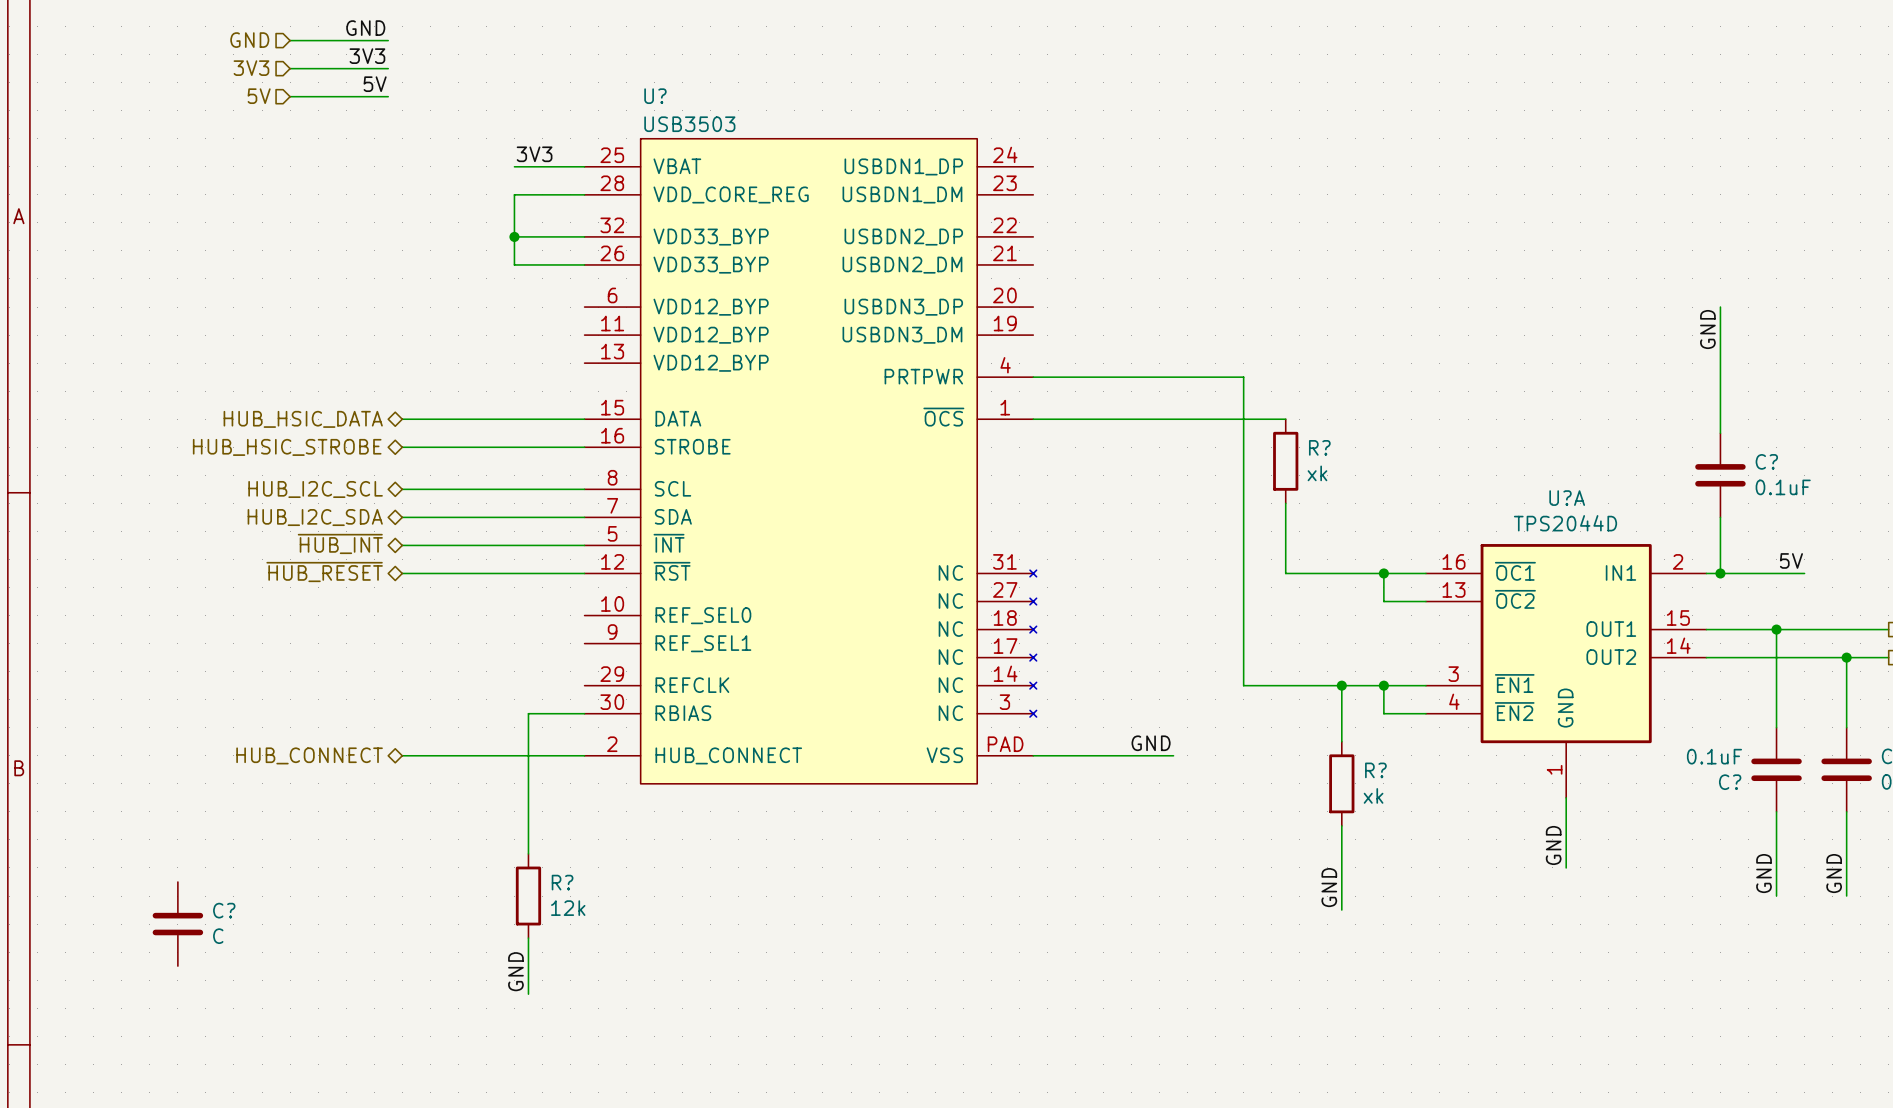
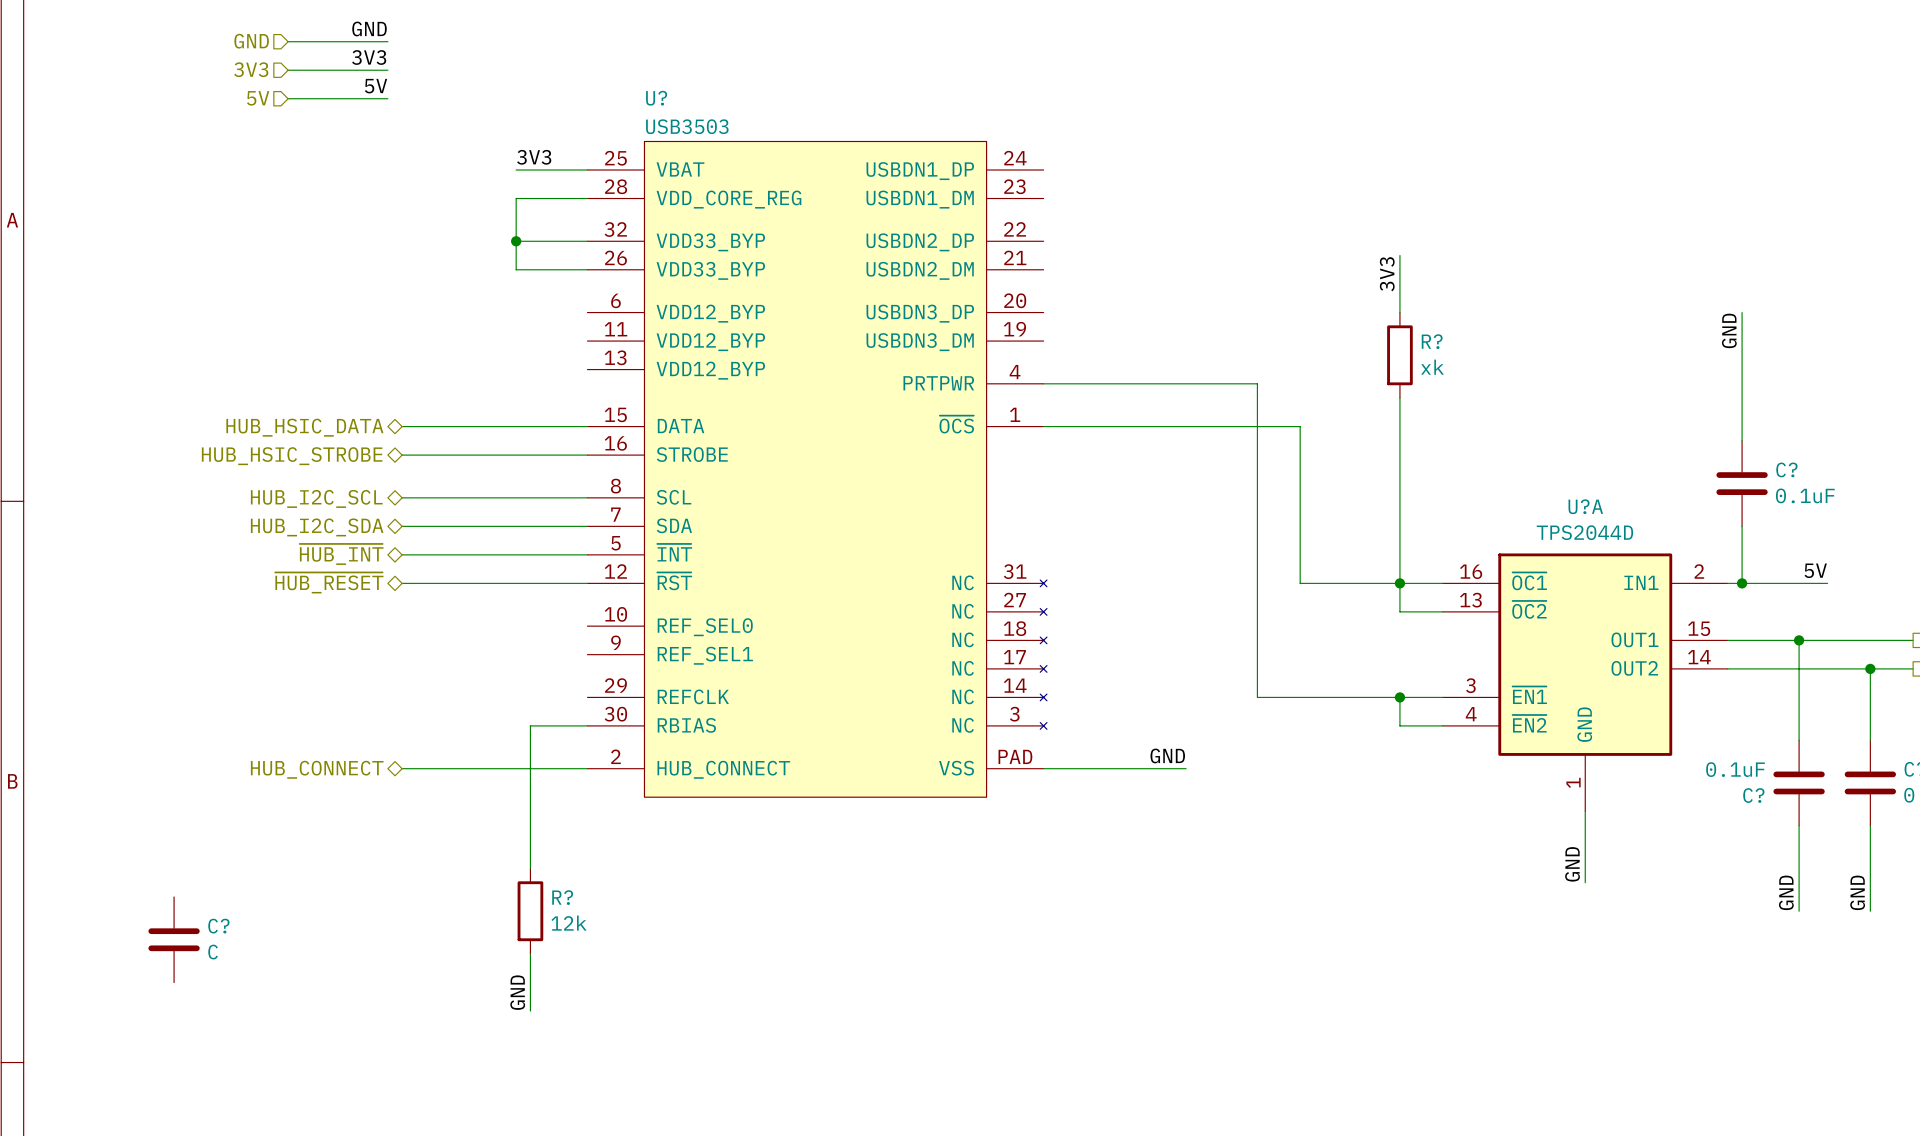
wire: none -> (1399, 255) (1399, 312)
label: none -> 3V3 (1387, 274)
wire: none -> (1399, 398) (1399, 583)
wire: none -> (1300, 426) (1300, 512)
R? position: (1285, 461) -> (1399, 355)
wire: (1341, 685) (1341, 741) -> none
junction: (1341, 685) -> none
R?: xk (1341, 783) -> none
wire: (1341, 825) (1341, 910) -> none
label: GND (1329, 887) -> none

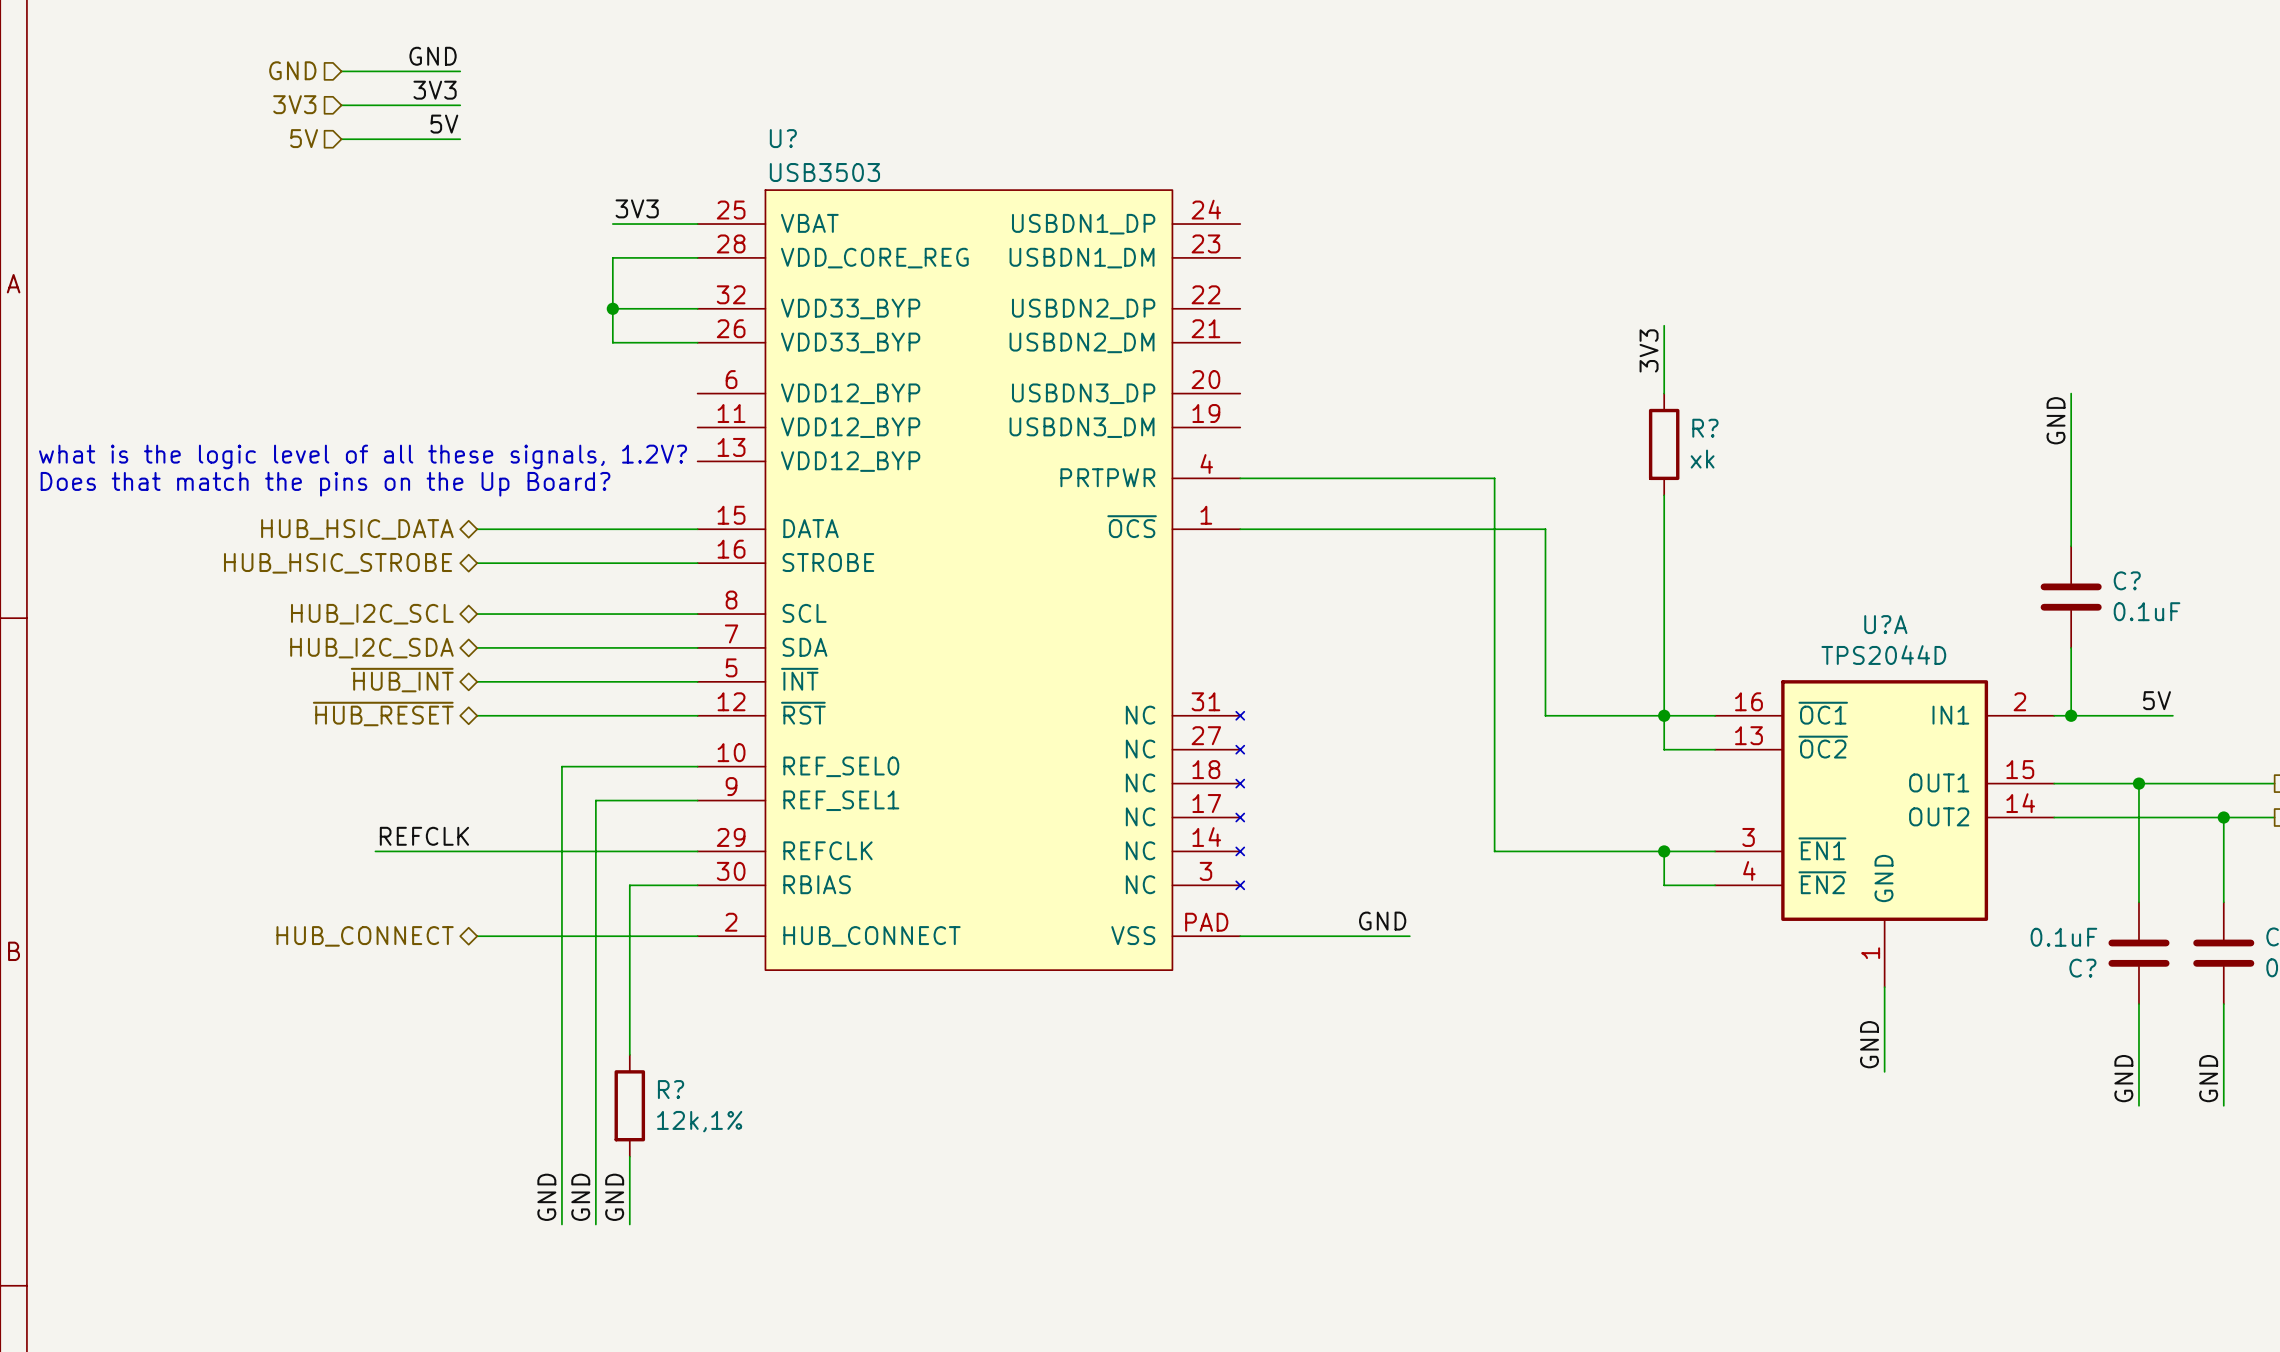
text: none -> what is the logic level of all these signals, 1.2V? (363, 456)
text: none -> Does that match the pins on the Up Board? (325, 484)
wire: none -> (697, 766) (561, 766) (561, 1224)
wire: none -> (697, 800) (595, 800) (595, 1224)
label: none -> REFCLK (424, 836)
wire: none -> (375, 851) (697, 851)
R? value: 12k (569, 923) -> 12k,1% (699, 1121)
C?: C (174, 939) -> none
label: none -> GND (546, 1197)
label: none -> GND (580, 1197)

